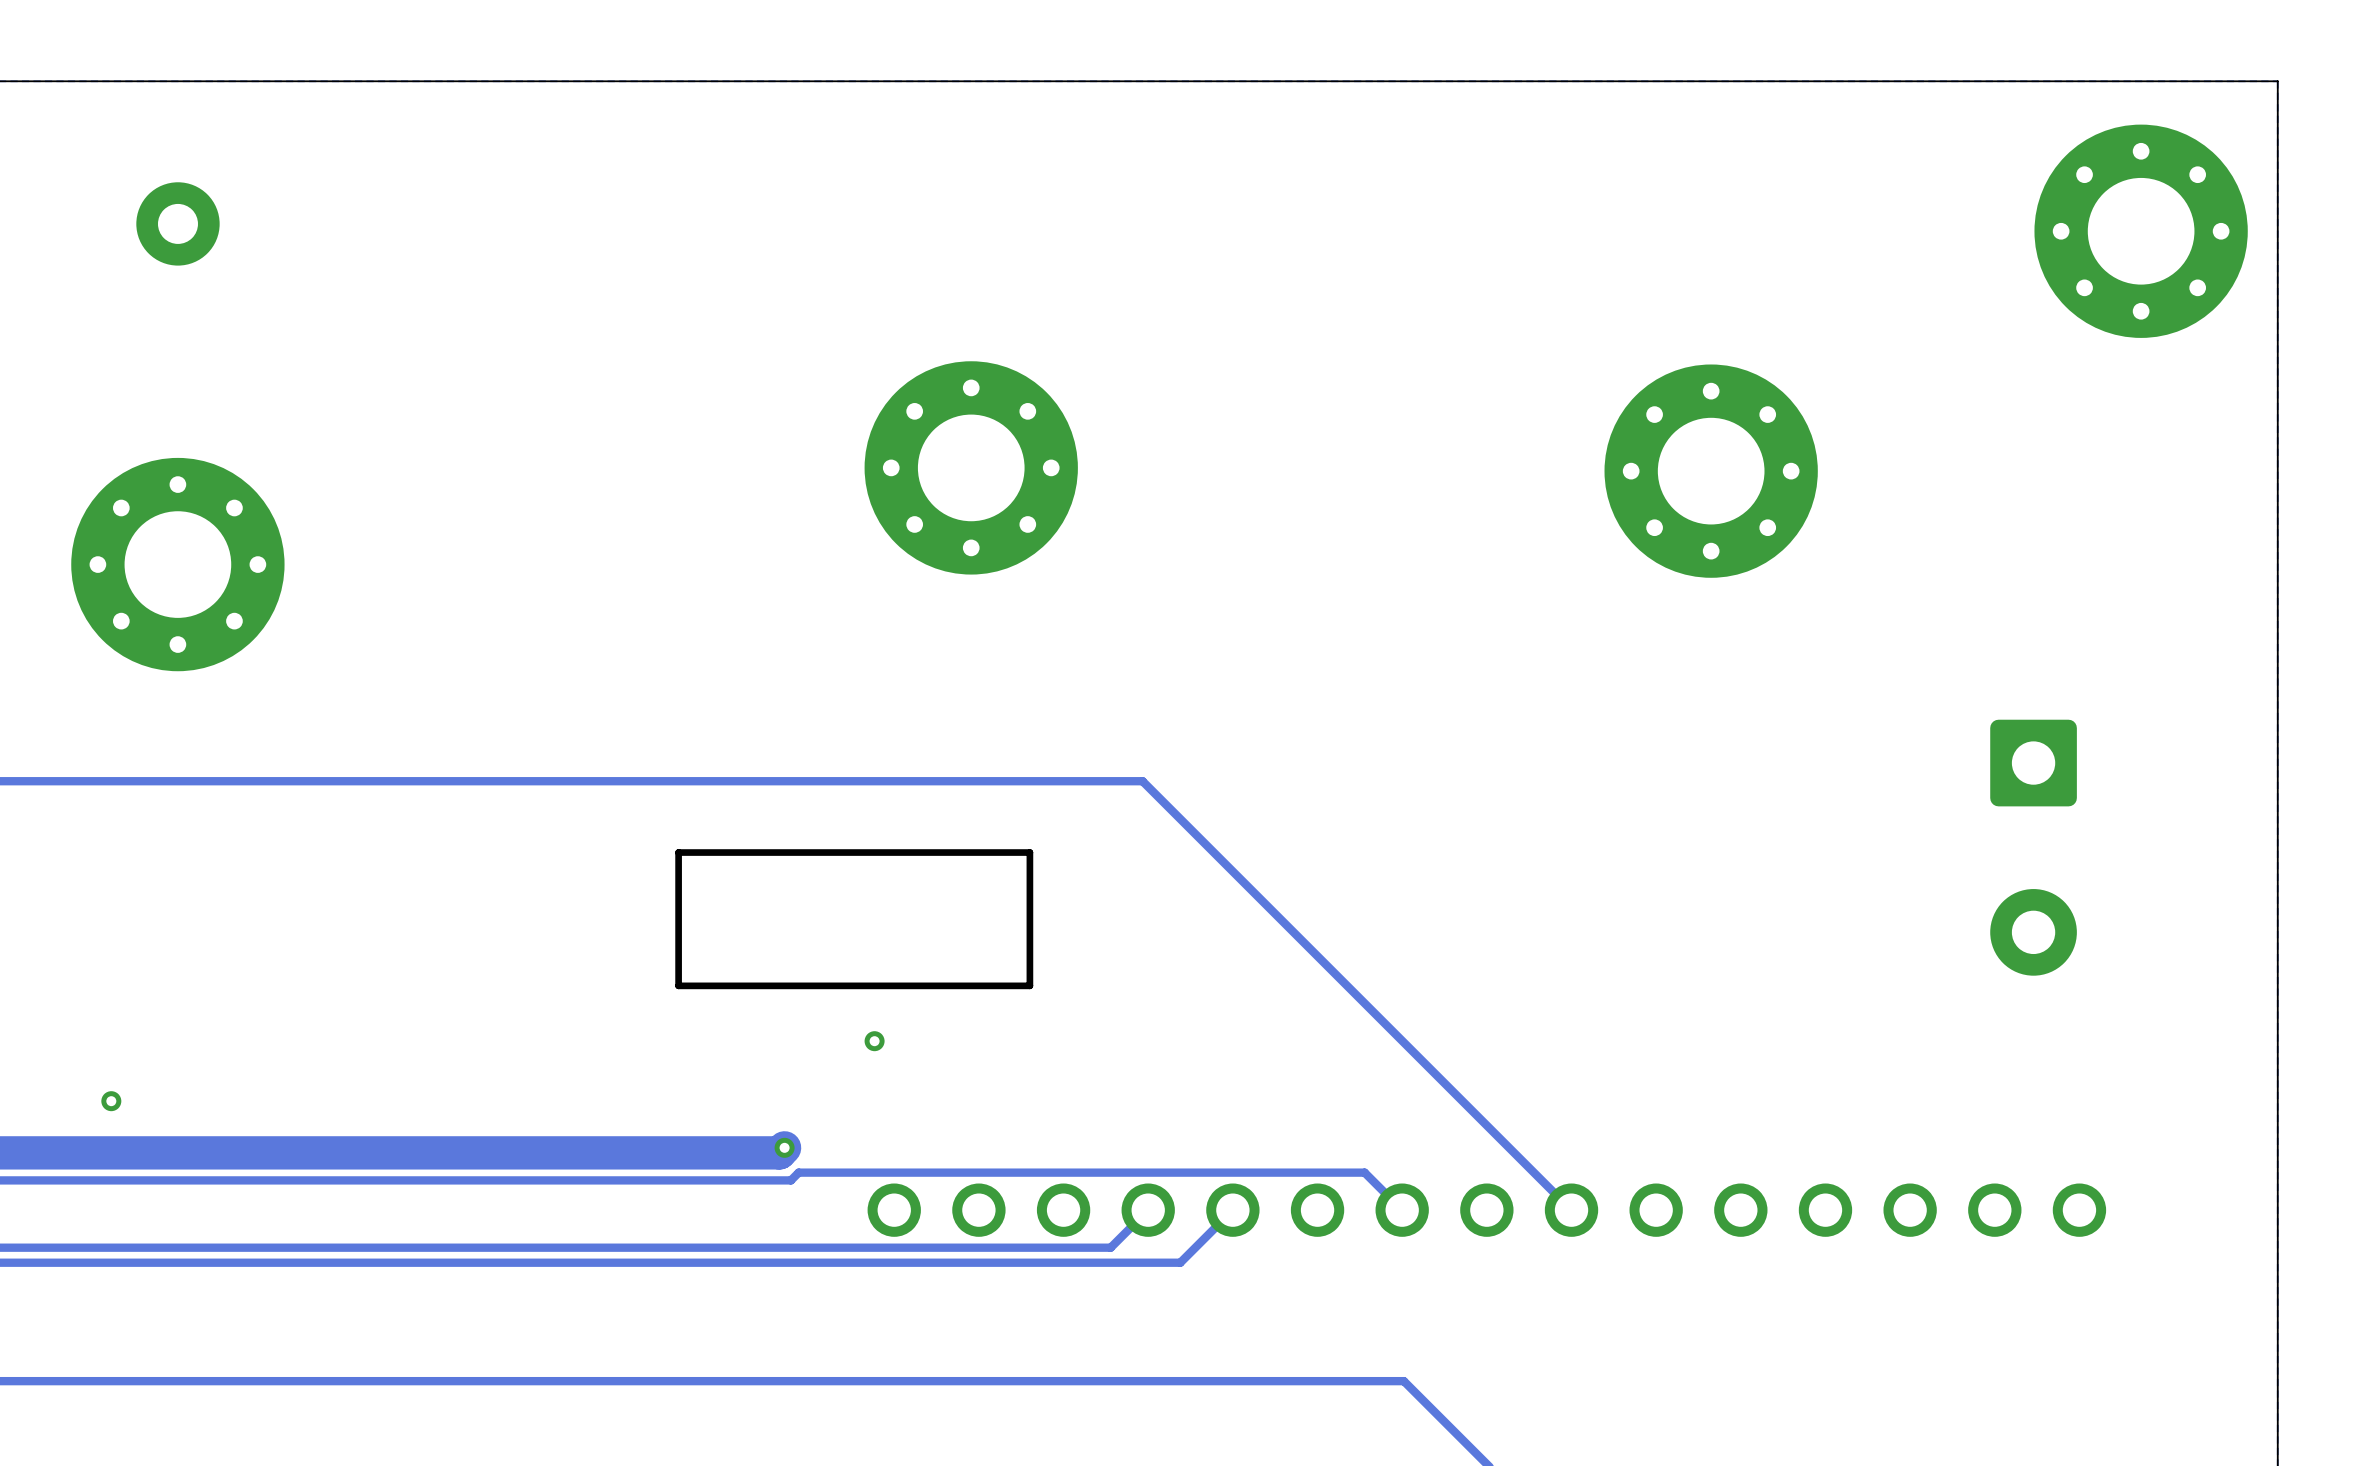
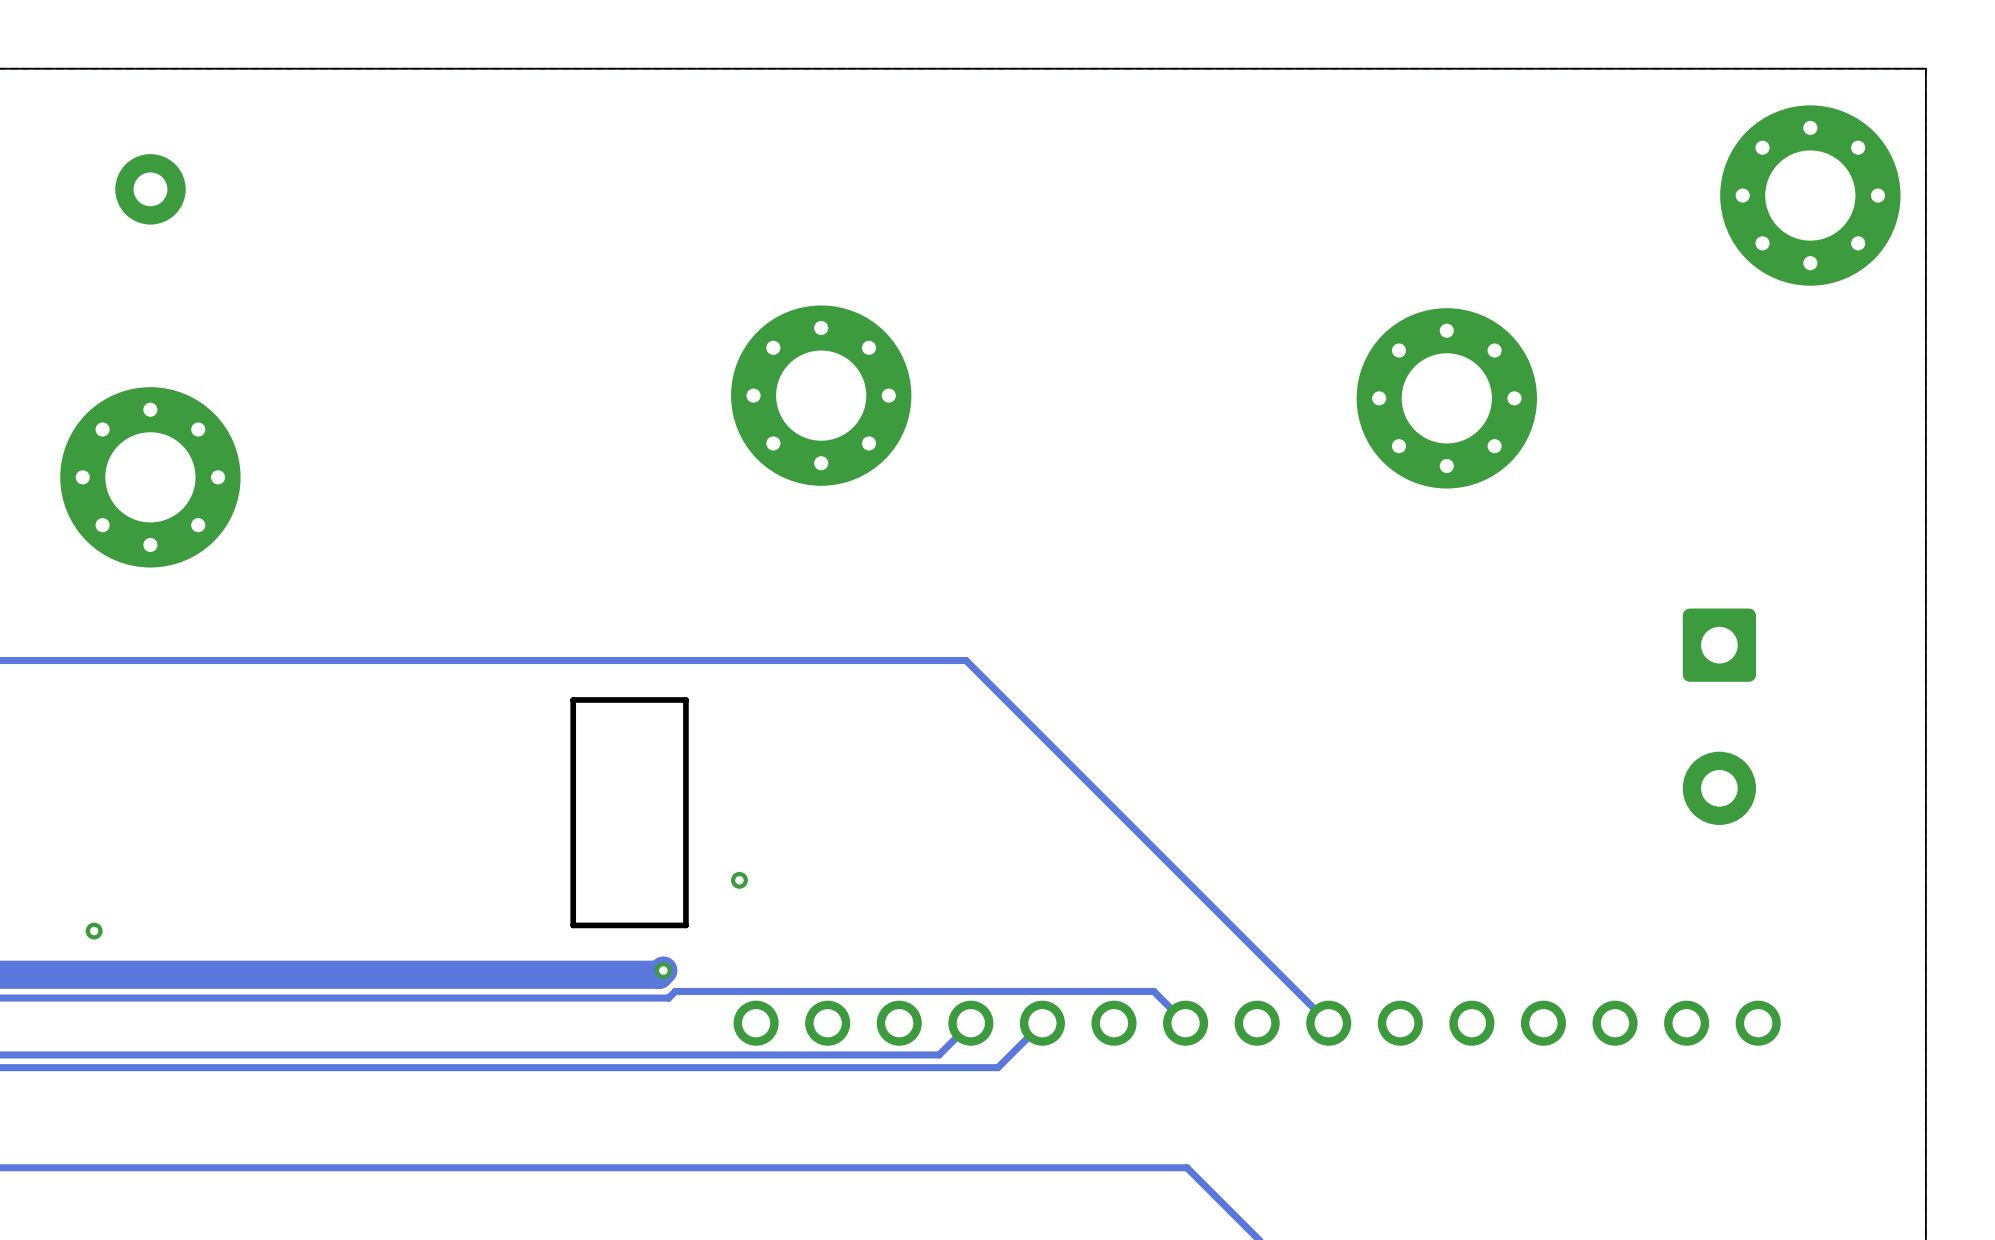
board edge: none -> (685, 699) (573, 699) (573, 925) (685, 925) (685, 699)
board edge: (1029, 852) (678, 852) (678, 985) (1029, 985) (1029, 852) -> none

